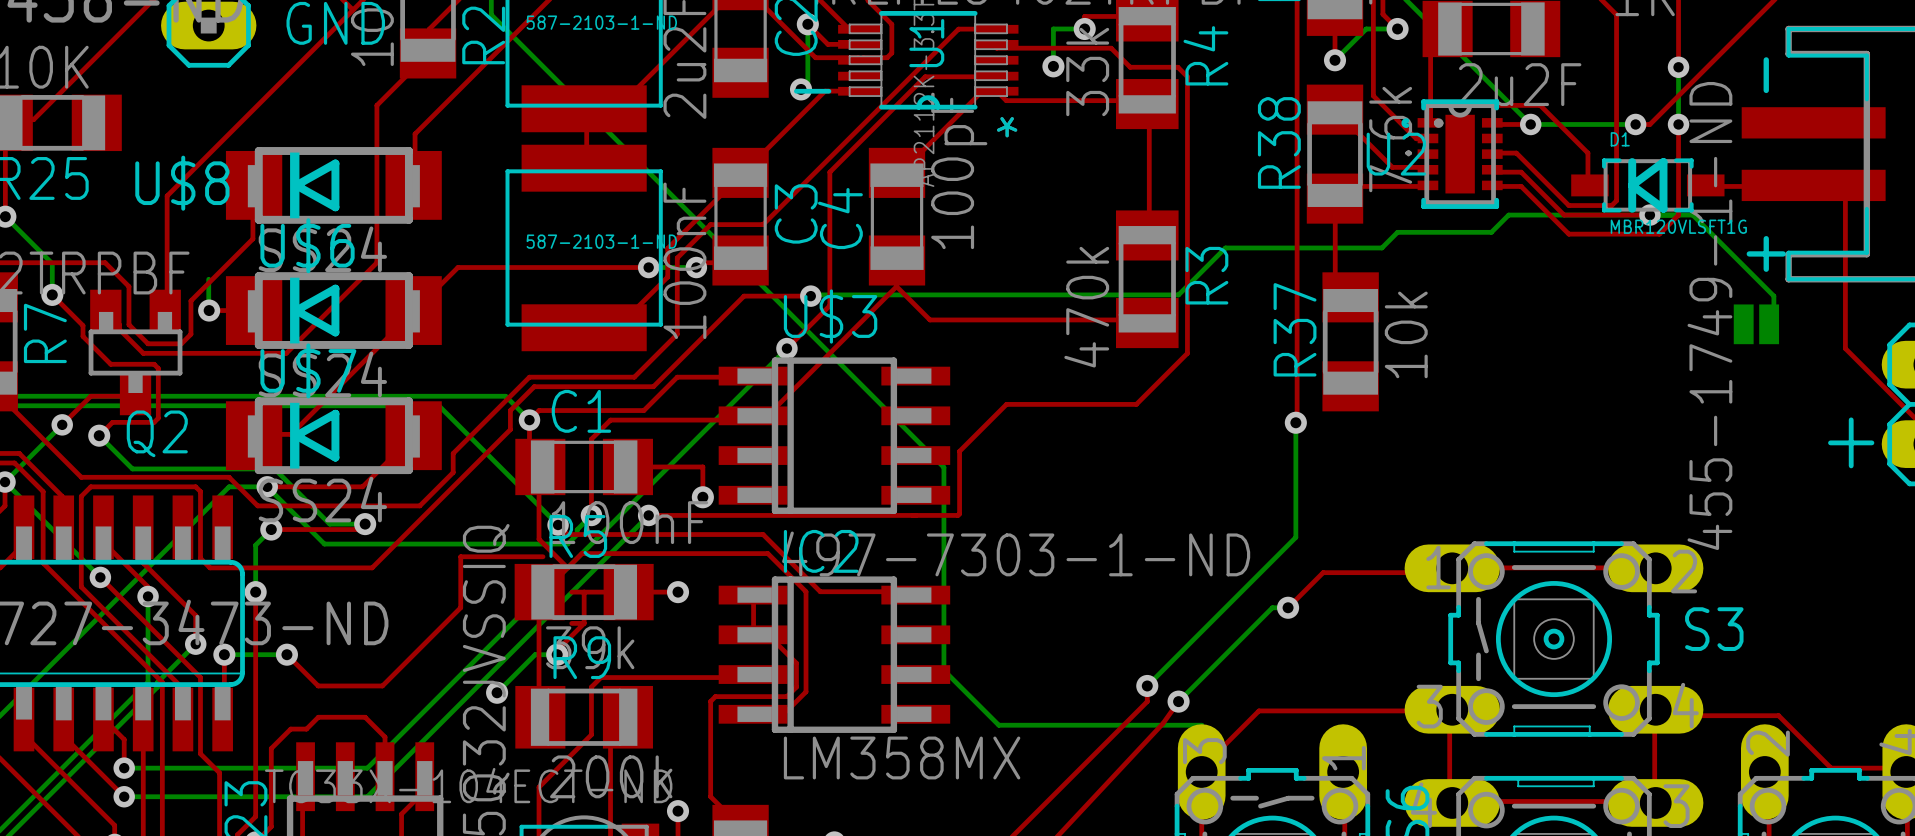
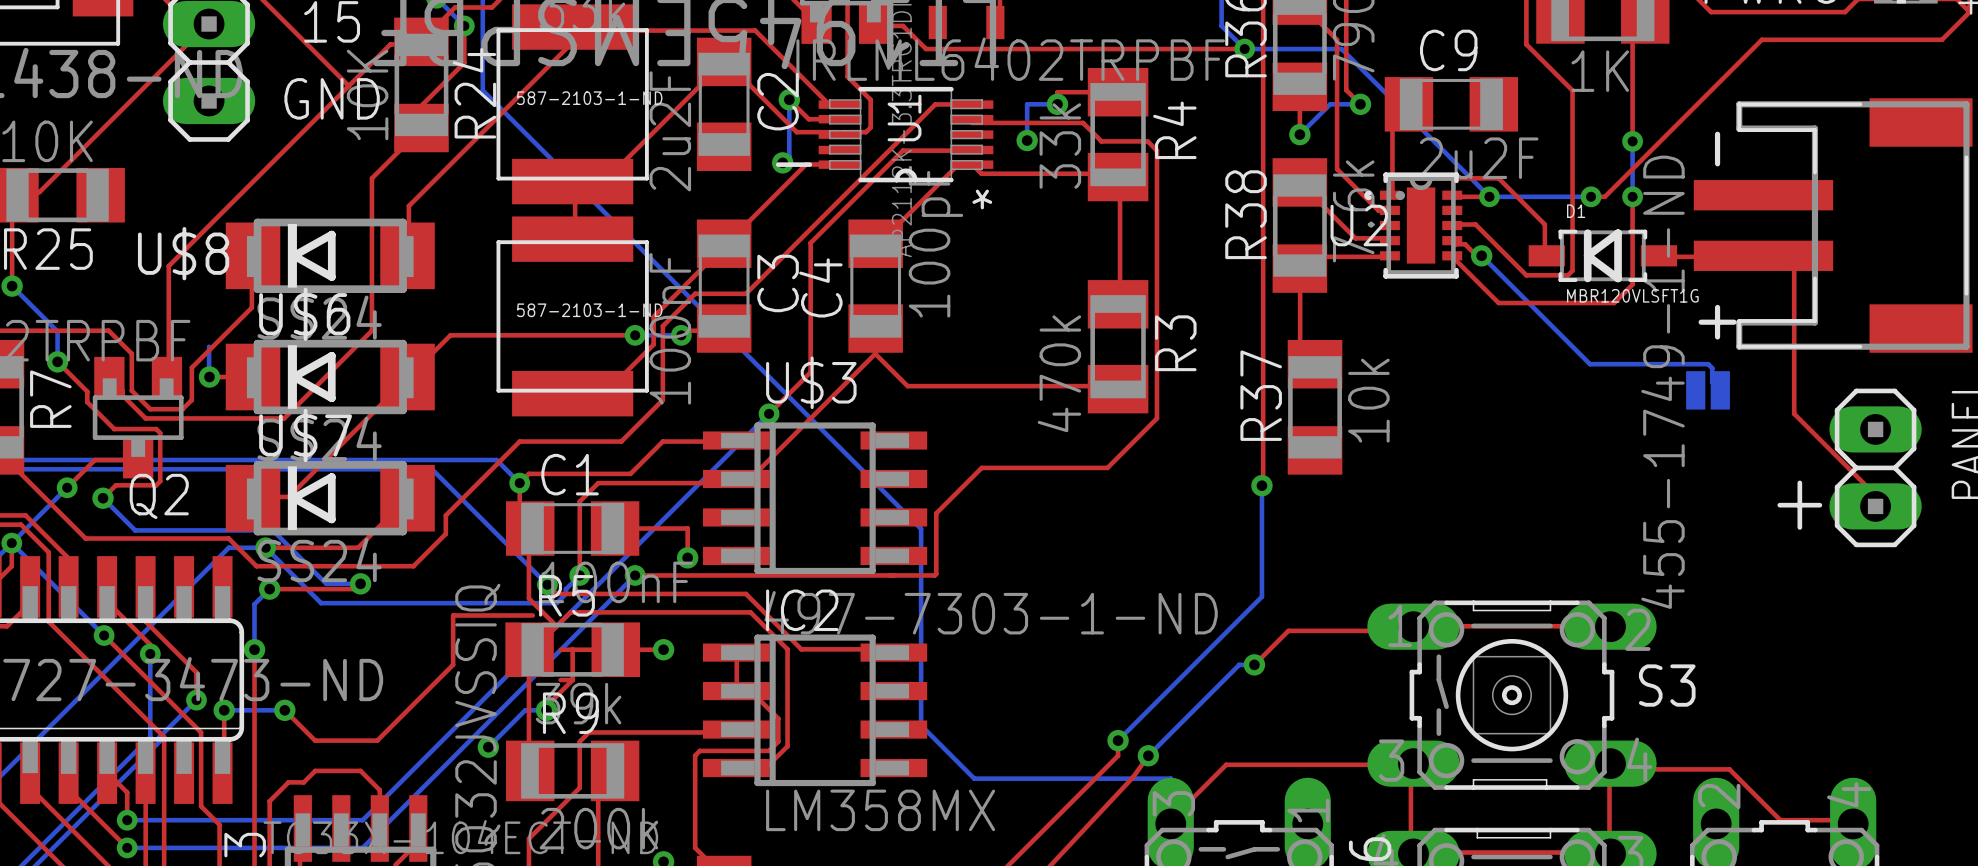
top track: (1492, 169) (1492, 172) (1521, 172) (1564, 215) (1649, 215) -> (1452, 240) (1455, 244) (1465, 244) (1476, 255) (1481, 255)
via: none -> (1481, 255)
top track: (1492, 186) (1521, 186) (1568, 234) -> (1452, 256) (1498, 303) (1526, 303)
via: (1649, 215) -> none
top track: (810, 296) (744, 296) (653, 386) (534, 386) (510, 410) (510, 429) (372, 567) (210, 567) (200, 558) (200, 491) (195, 486) (90, 486) (81, 496) (81, 586) (181, 687) (182, 719) -> none
bottom track: (810, 296) (1178, 294) (1225, 247) (1381, 247) (1397, 232) (1491, 232) (1508, 215) (1692, 215) (1773, 296) (1773, 315) (1769, 319) (1769, 324) -> (1481, 255) (1590, 364) (1708, 364) (1712, 368) (1712, 382) (1720, 390)
via: (810, 296) -> none

